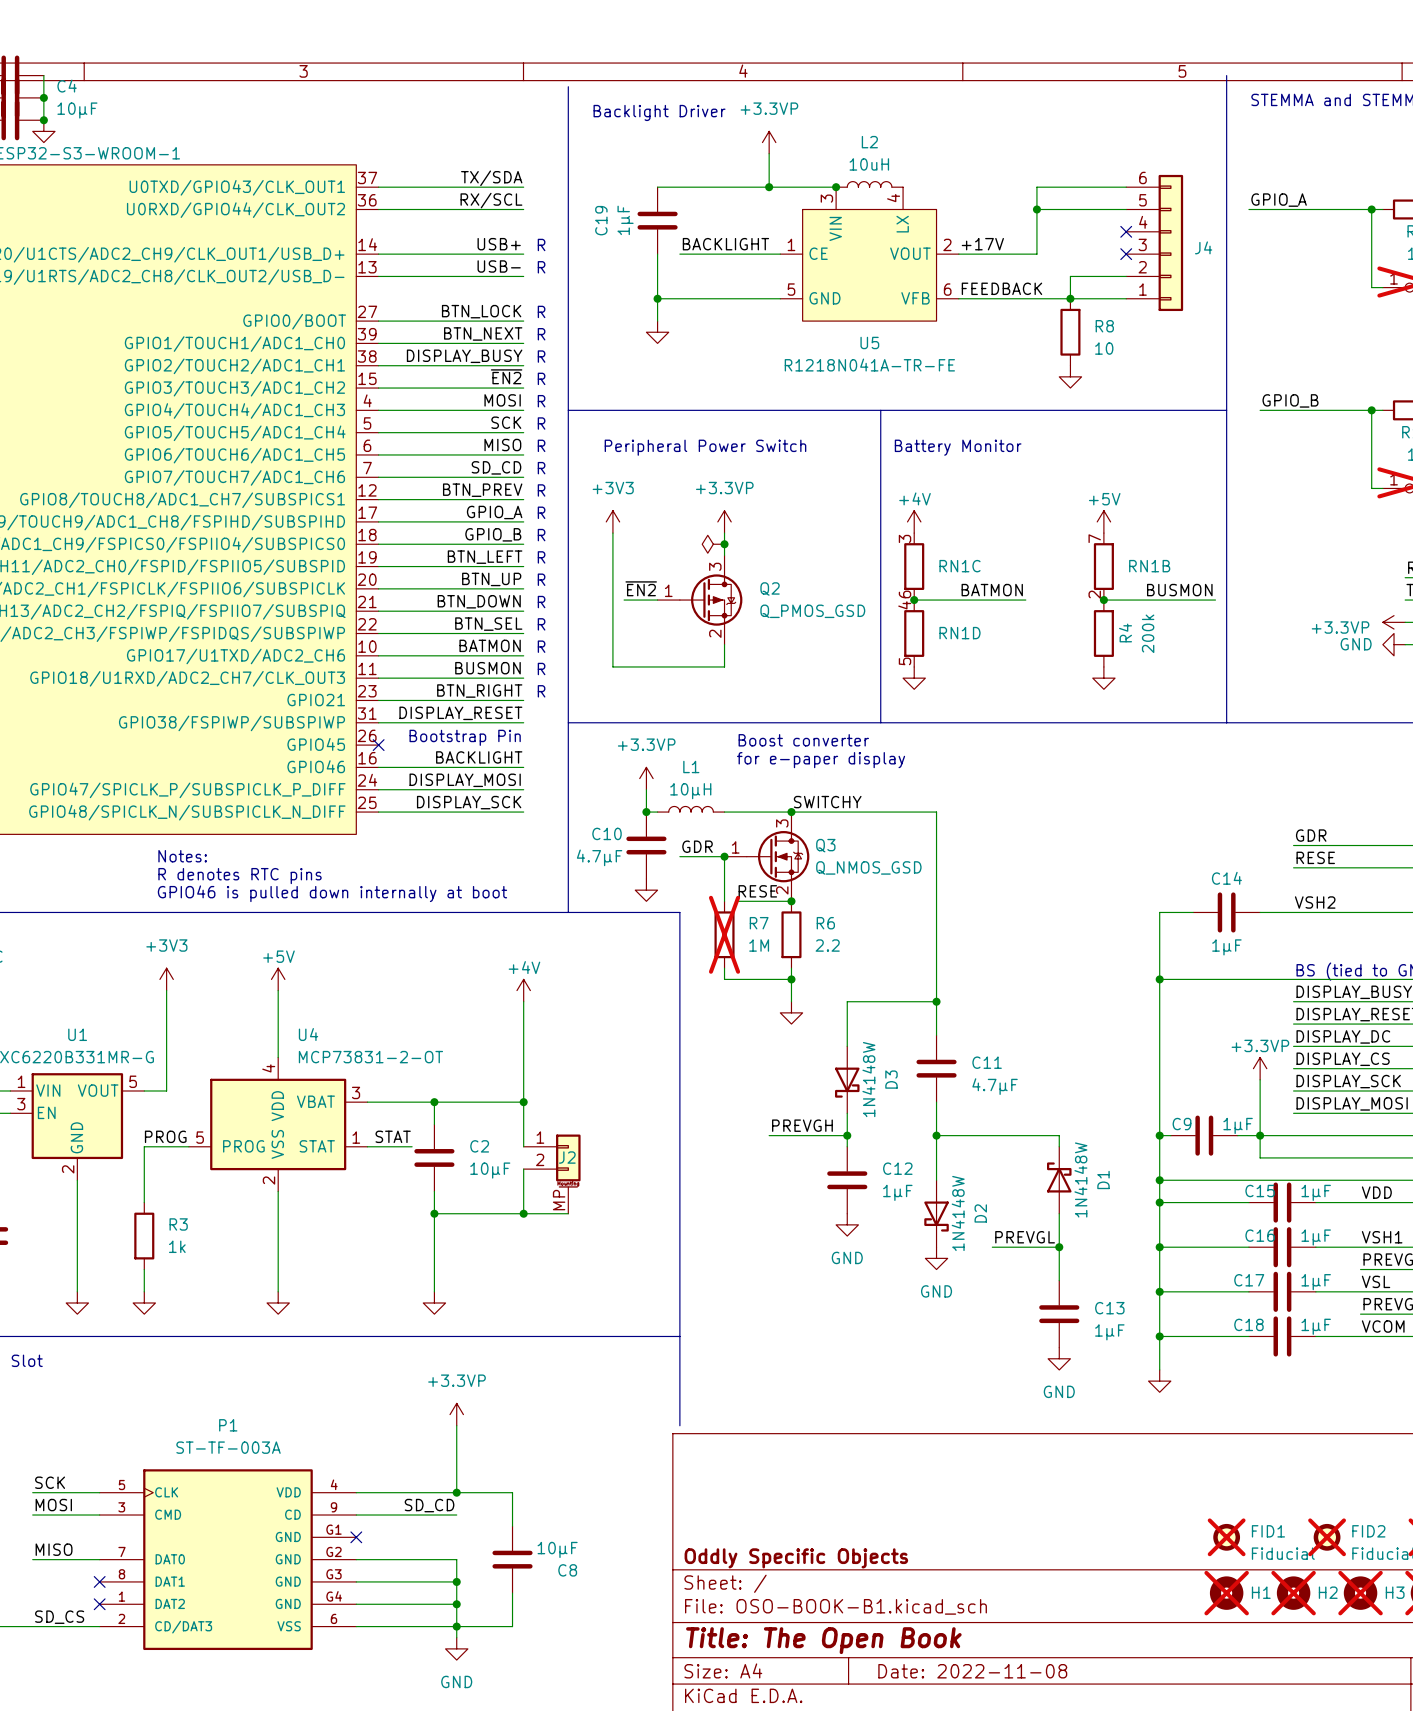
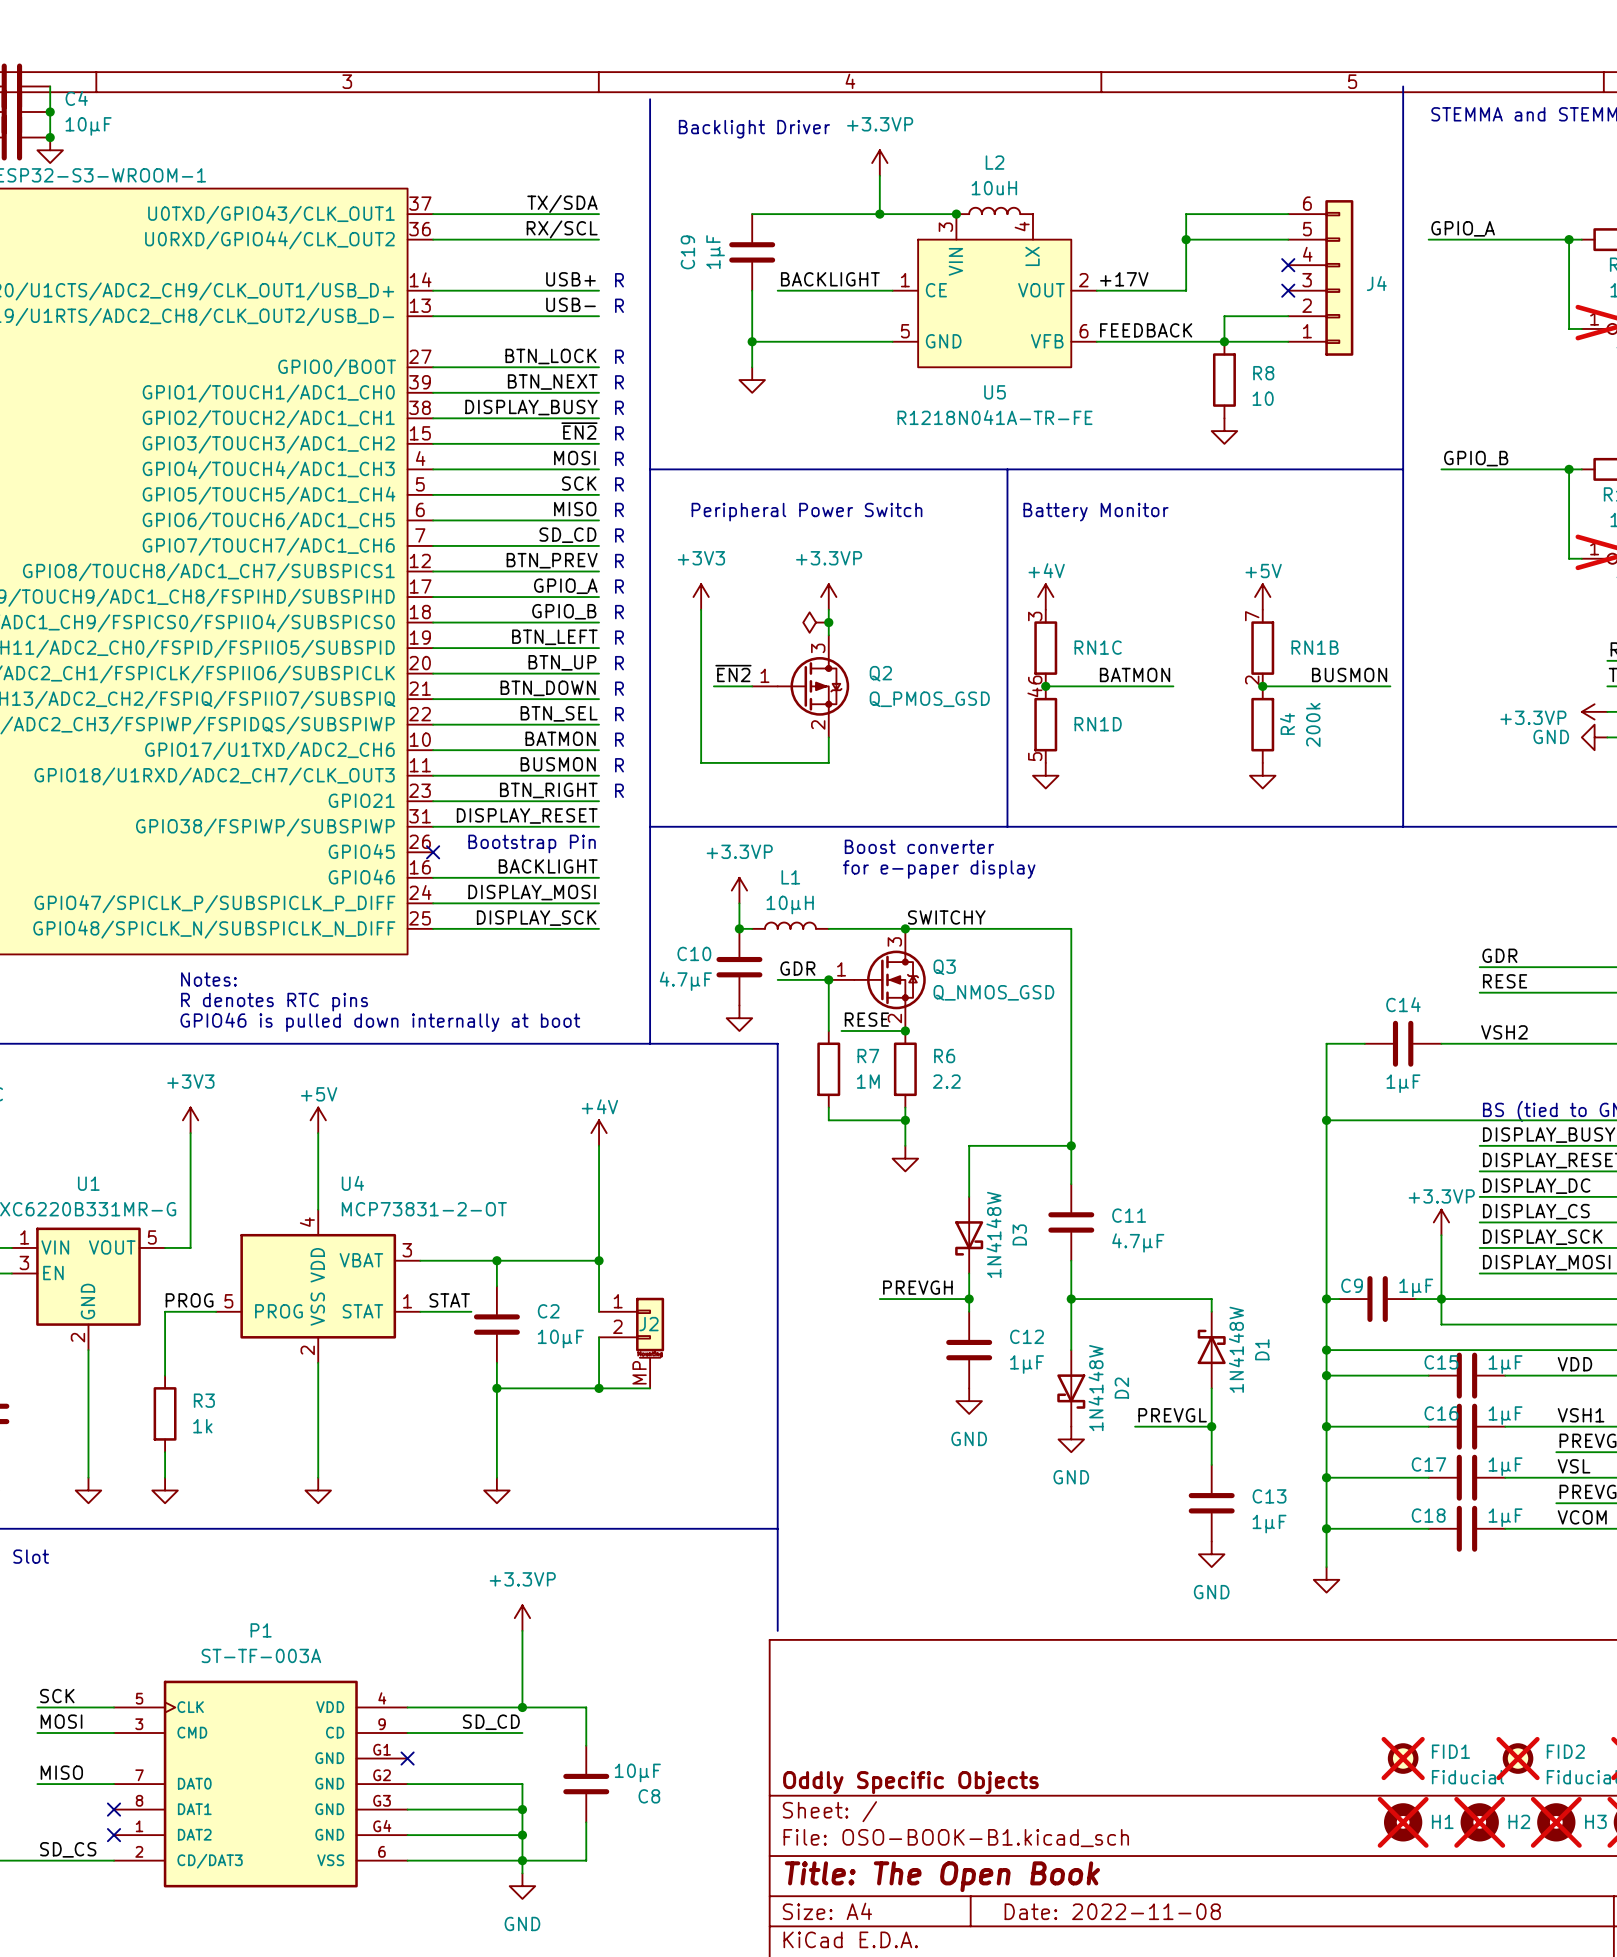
R7 do-not-place cross: (724, 934) -> none

